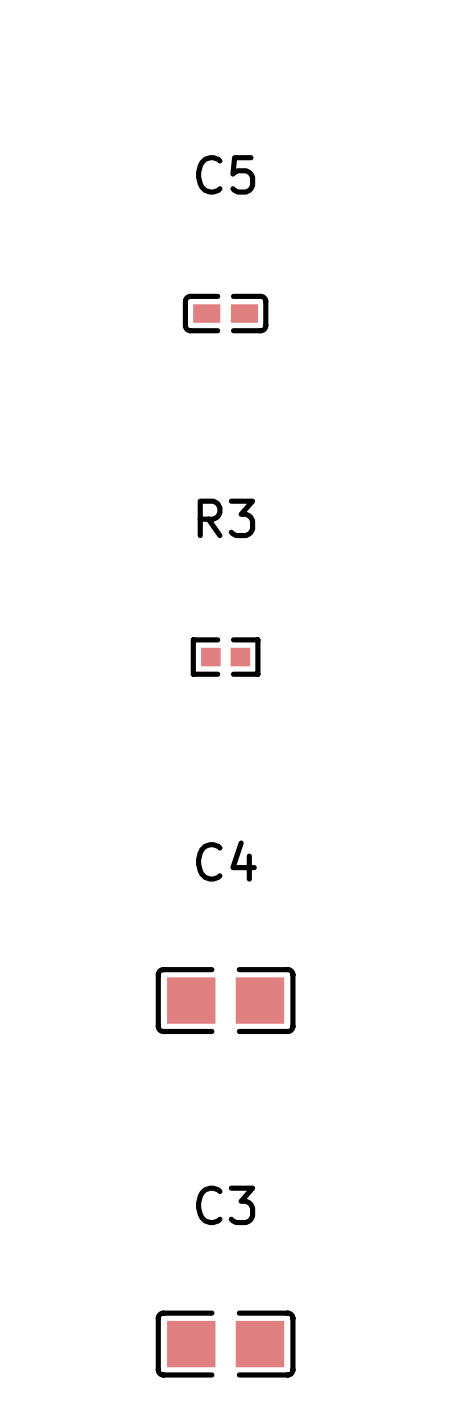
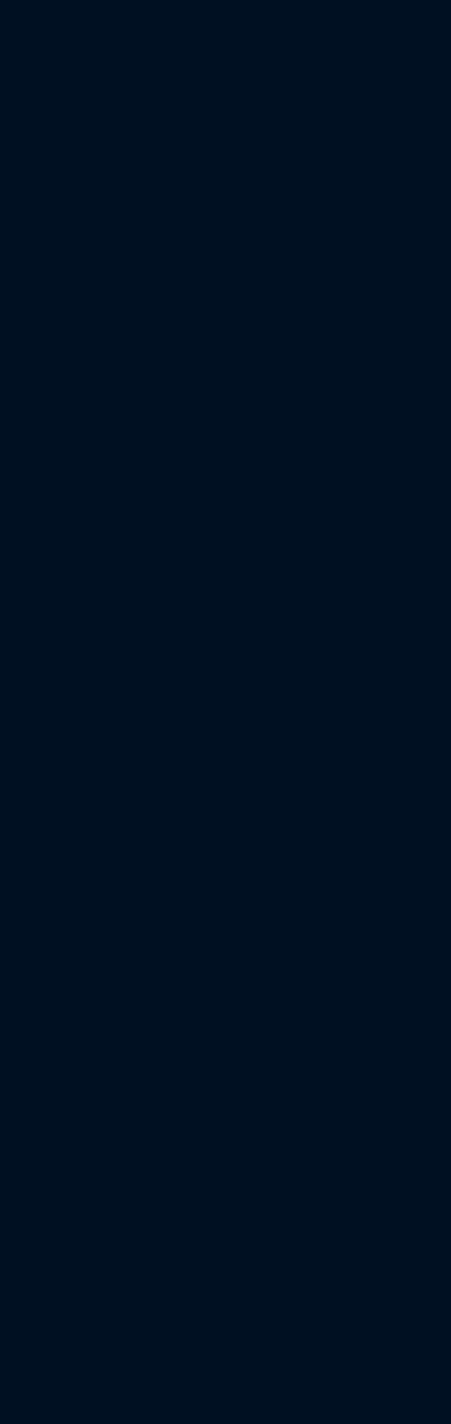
C5: (225, 313) -> none
R3: (225, 657) -> none
C4: (225, 1000) -> none
C3: (225, 1344) -> none

